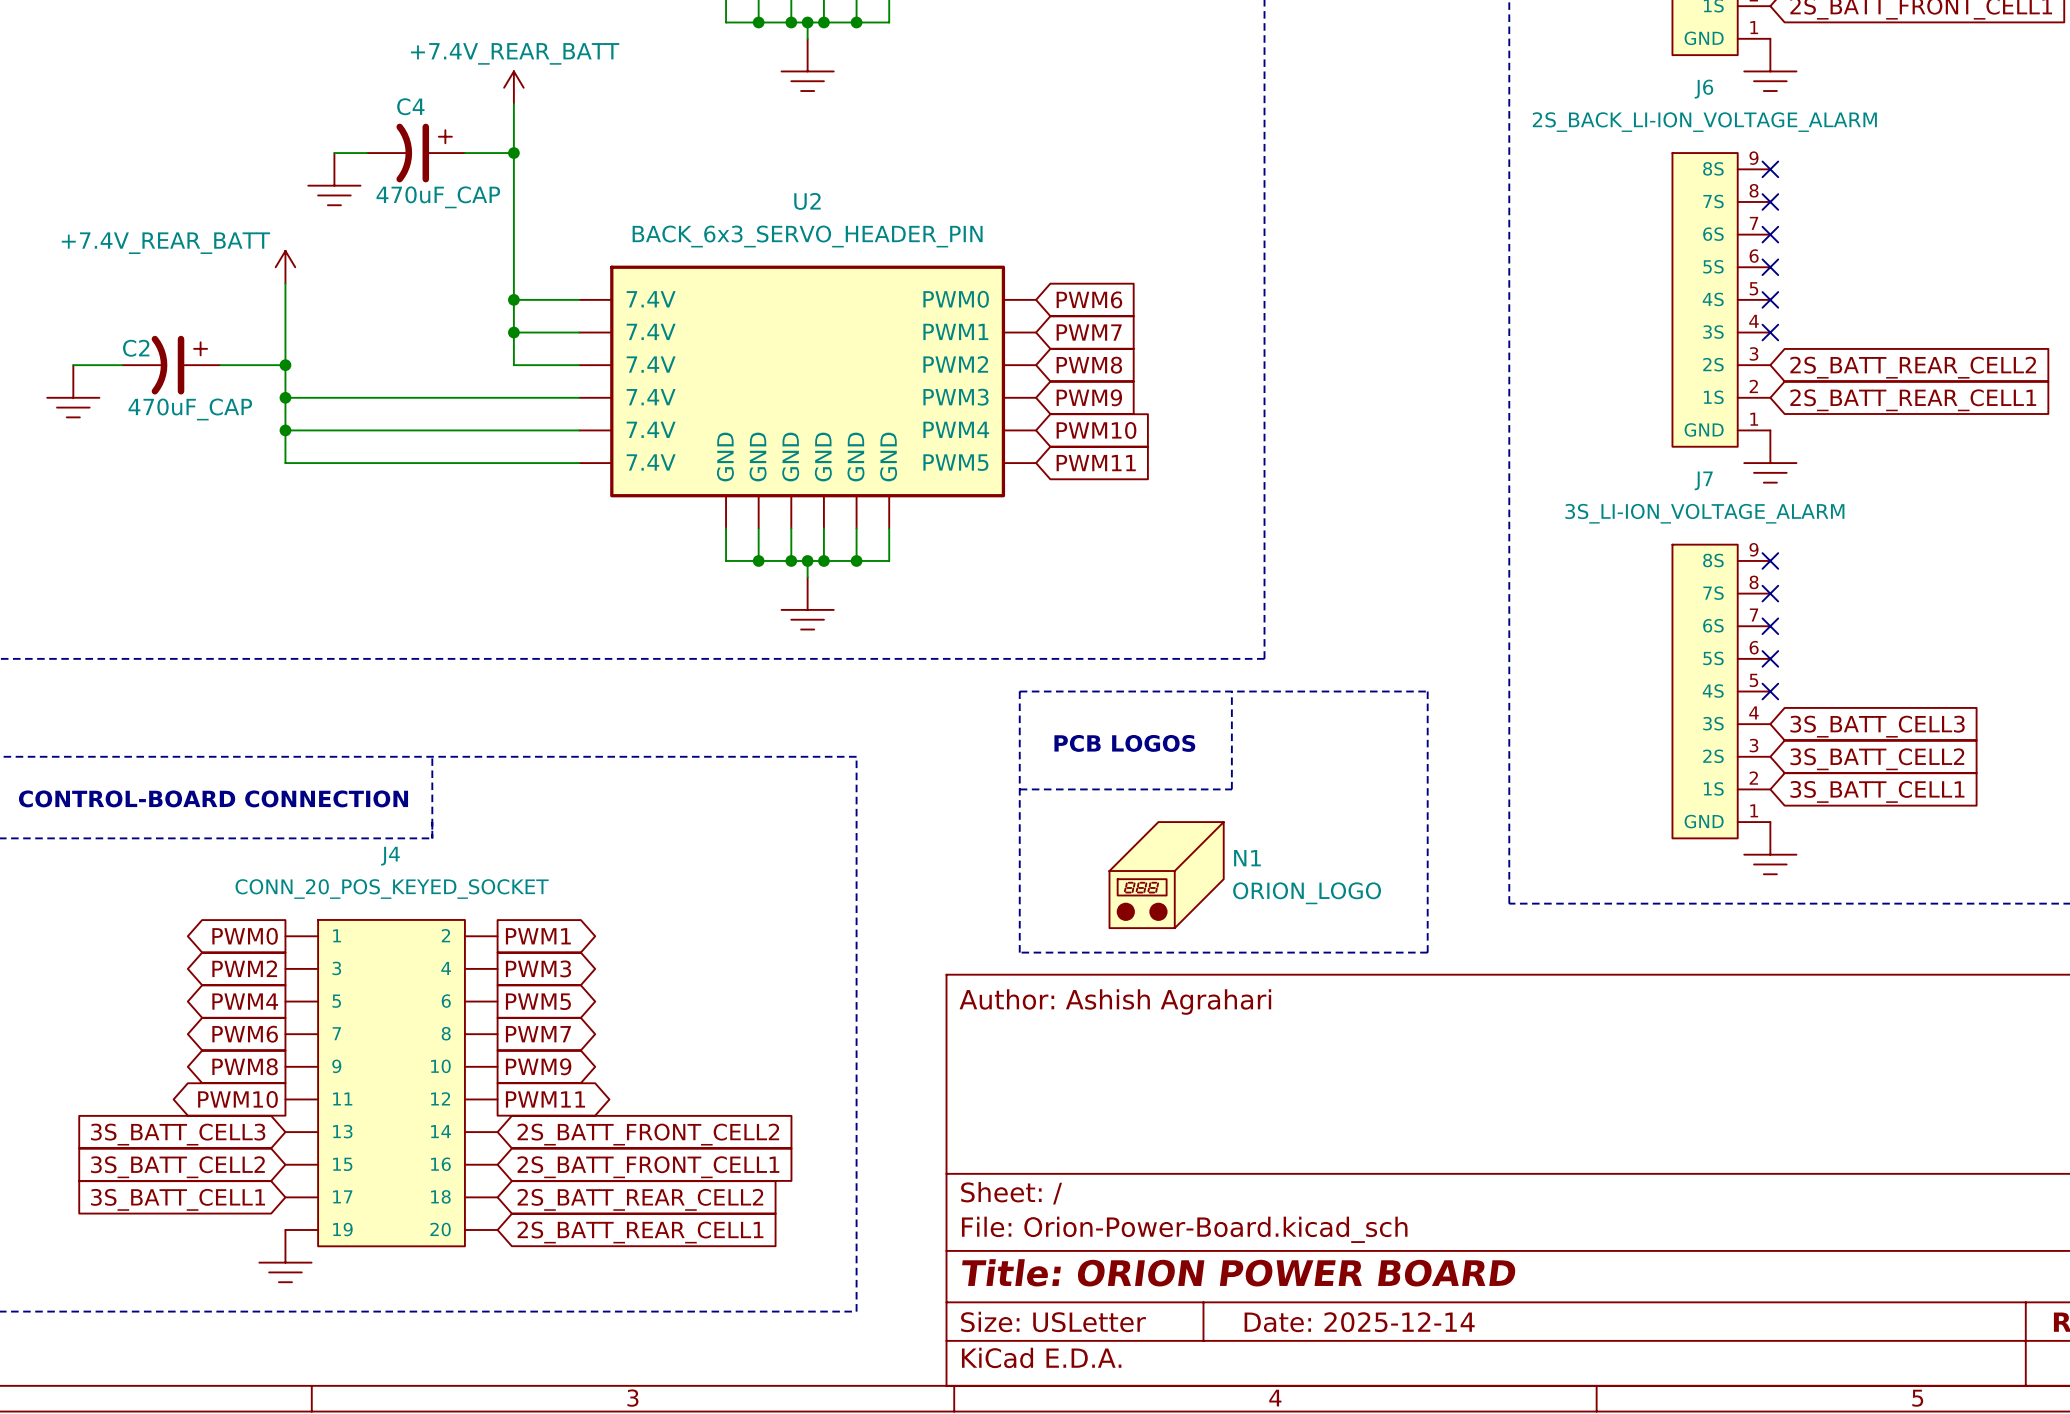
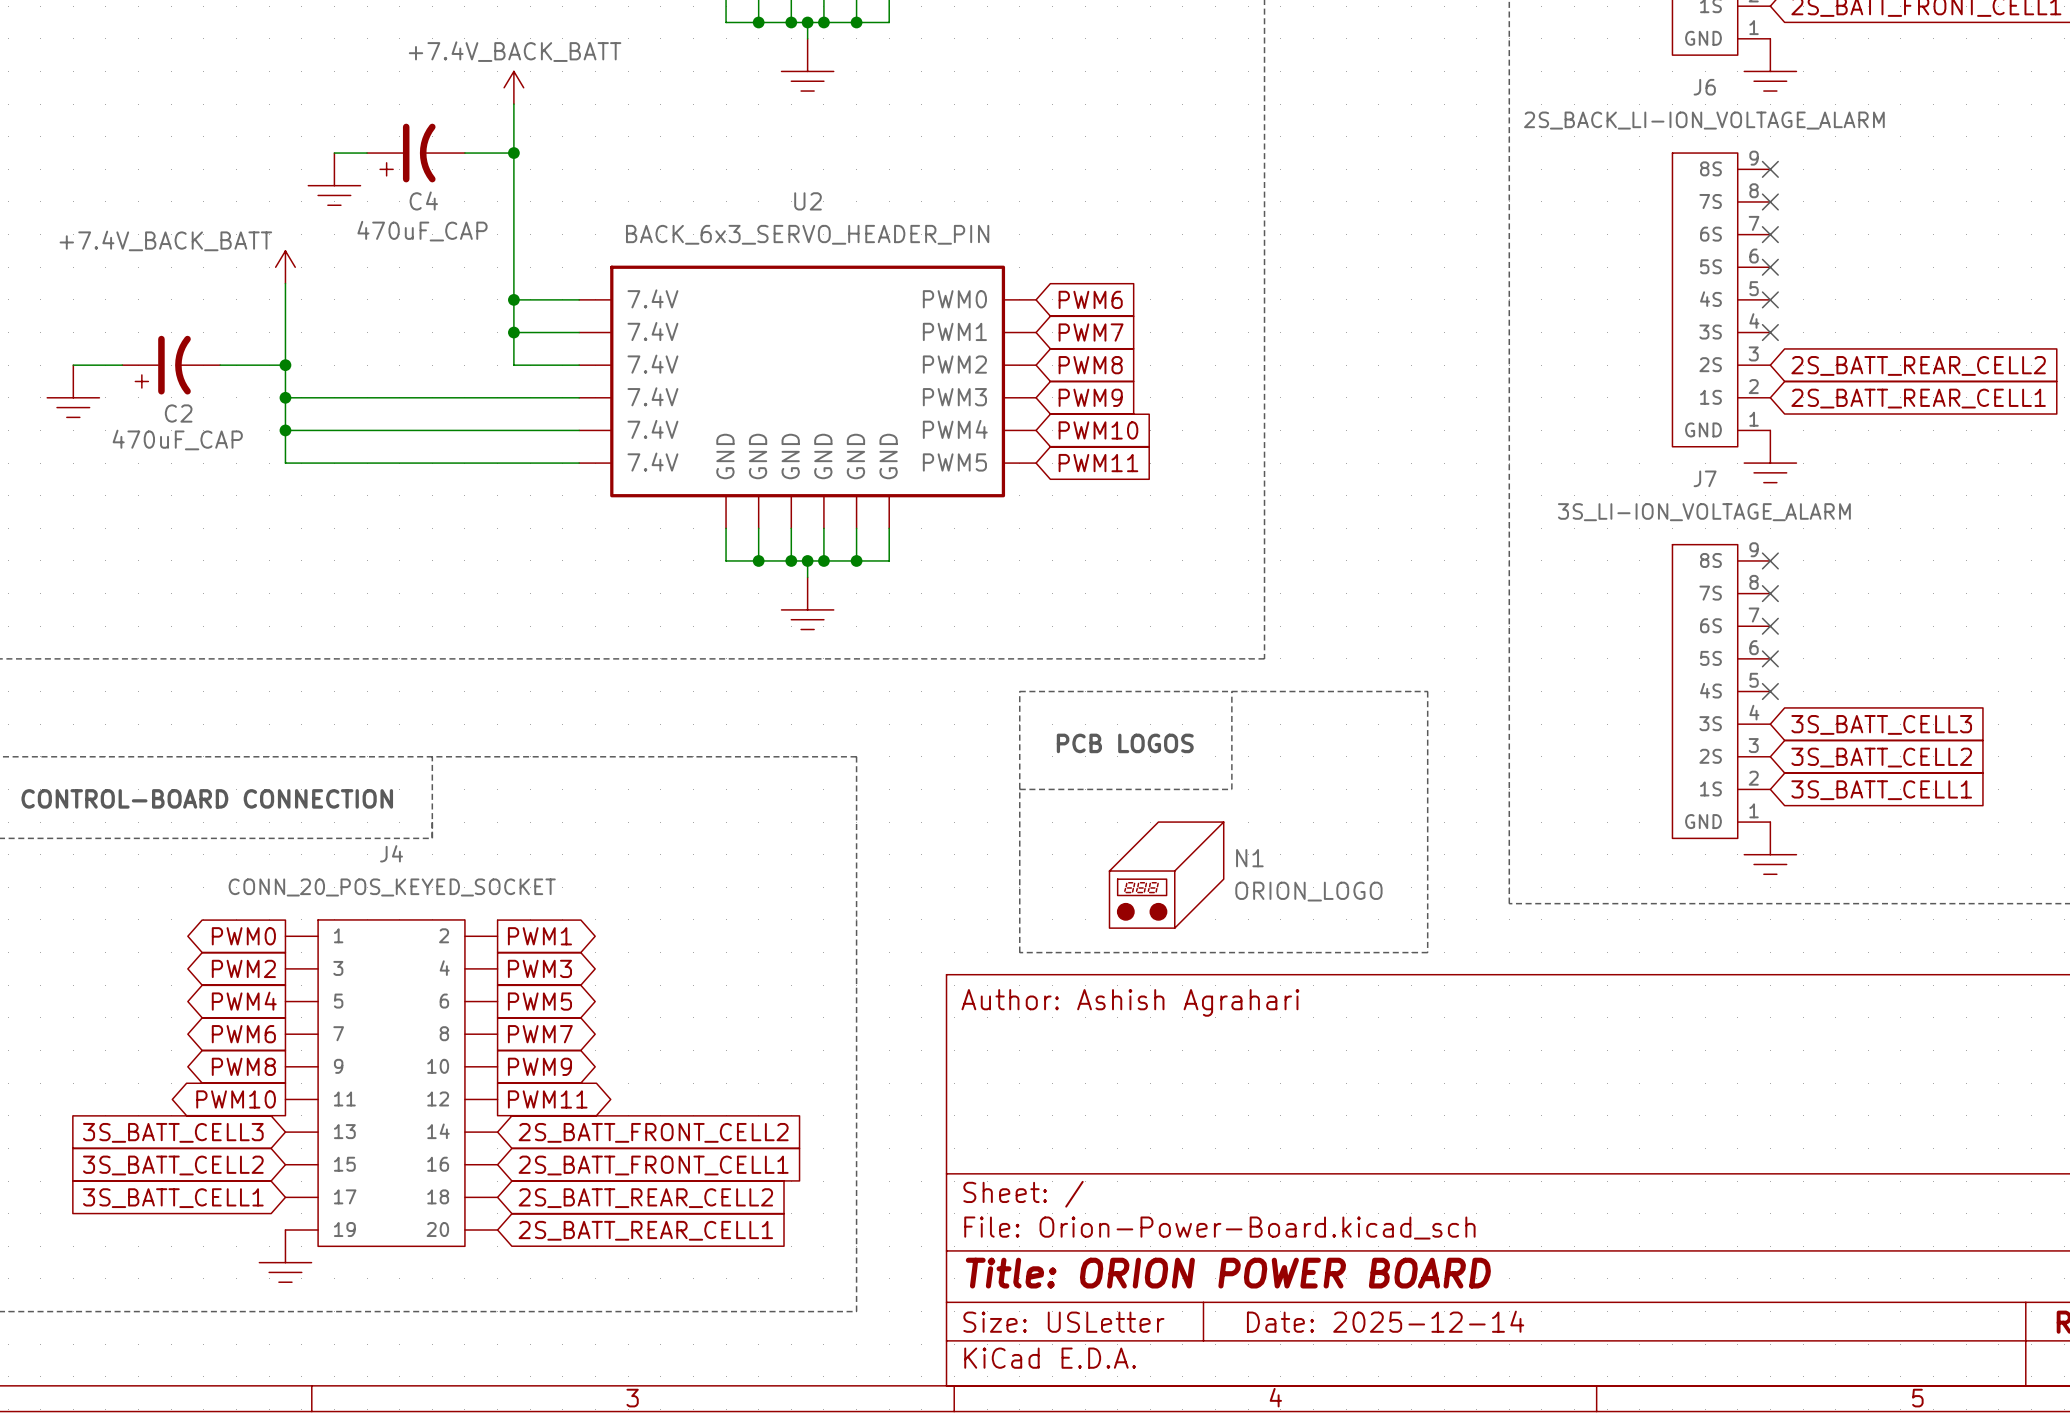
power symbol: +7.4V_REAR_BATT (513, 87) -> +7.4V_BACK_BATT (513, 87)
C4 rotation: 0° (424, 153) -> 180° (407, 153)
C4 value position: 470uF_CAP (438, 197) -> 470uF_CAP (422, 231)
power symbol: +7.4V_REAR_BATT (285, 267) -> +7.4V_BACK_BATT (285, 267)
C2 name position: C2 (136, 348) -> C2 (178, 413)
C2 rotation: 0° (179, 365) -> 180° (163, 365)
C2 value position: 470uF_CAP (190, 409) -> 470uF_CAP (177, 440)

